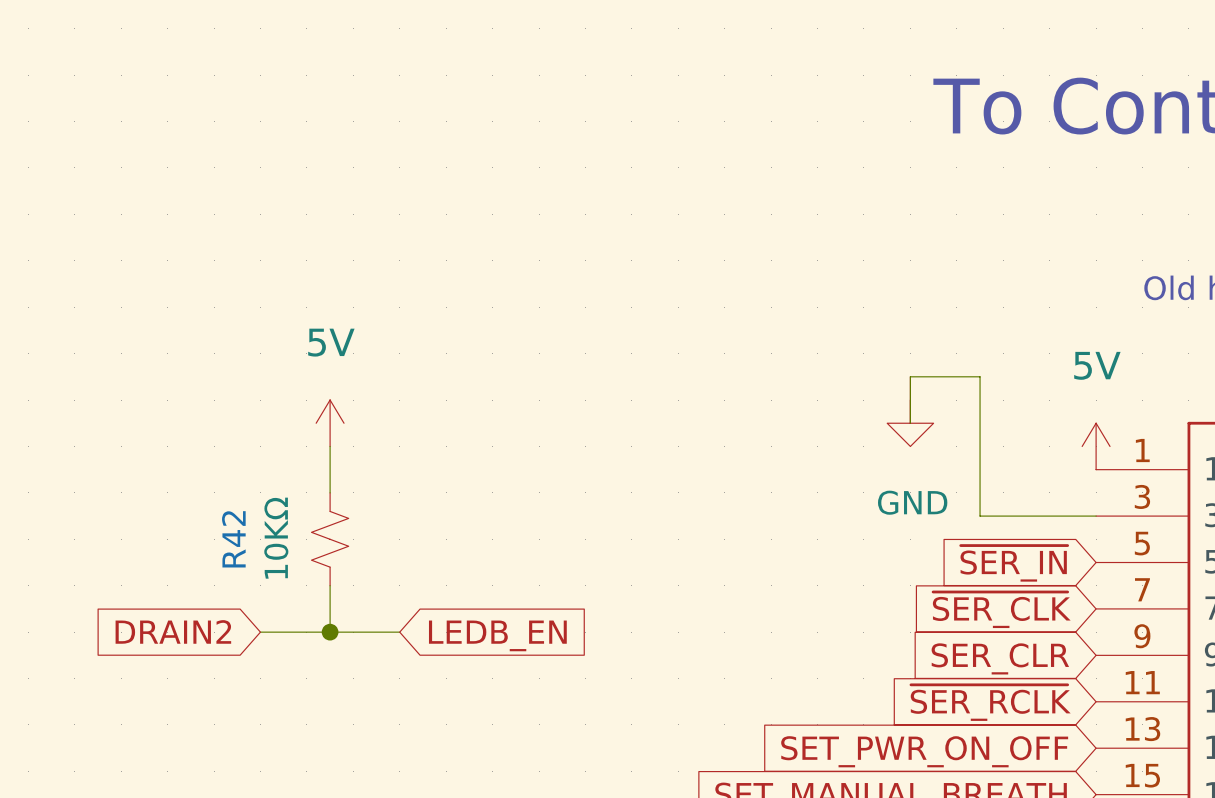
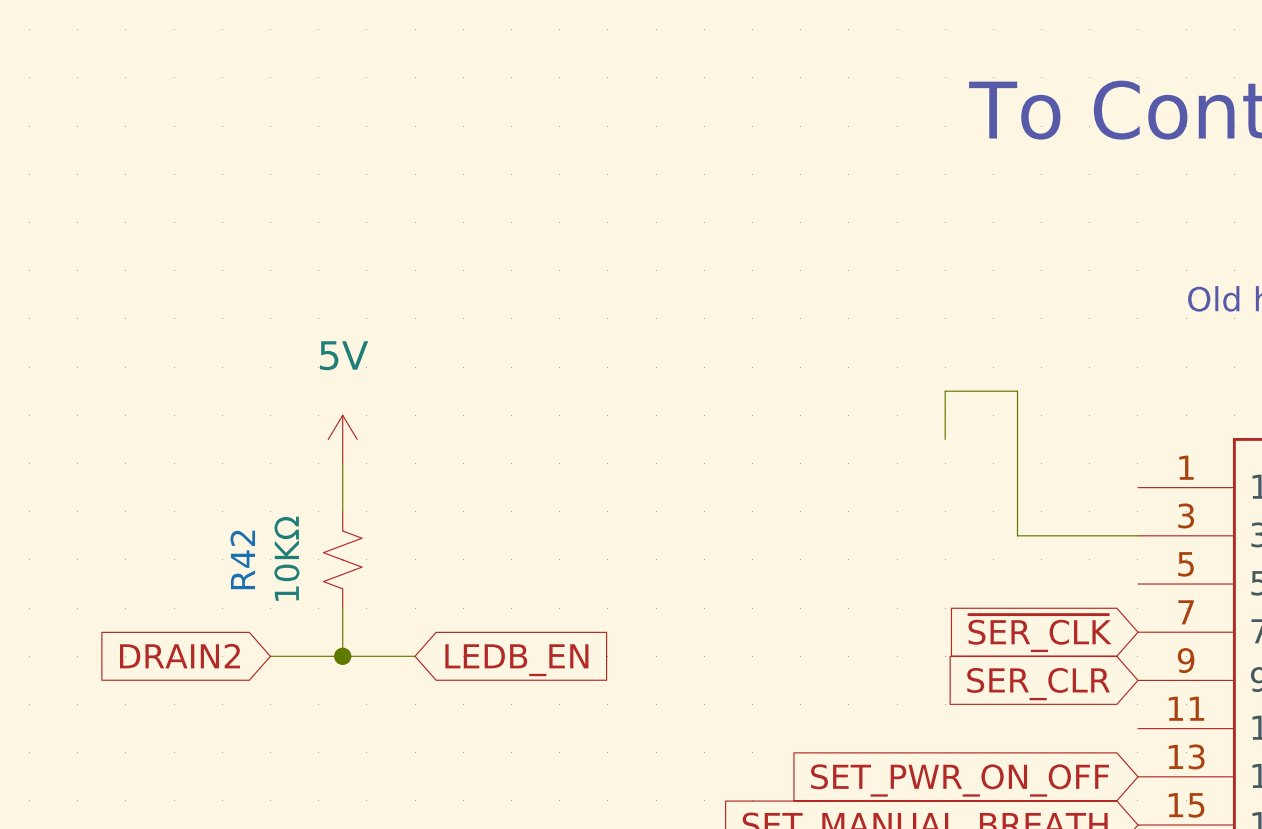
power symbol: GND (910, 411) -> none
power symbol: 5V (1096, 446) -> none
global label: ~{SER_IN} (1014, 563) -> none
global label: ~{SER_RCLK} (990, 702) -> none

